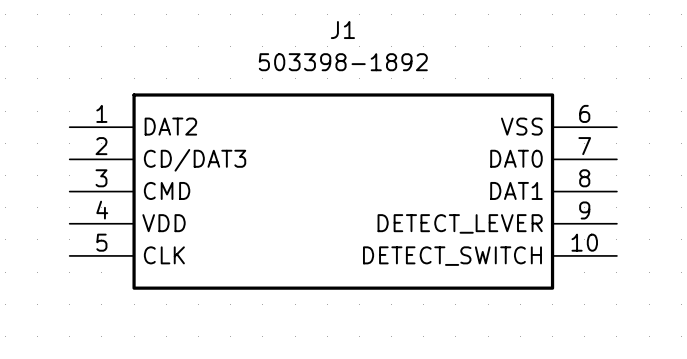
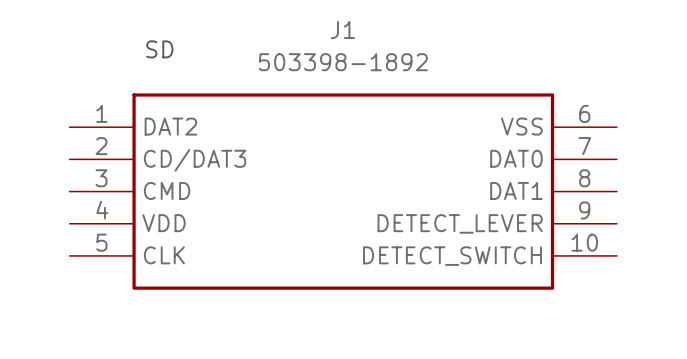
text: none -> SD (159, 49)

